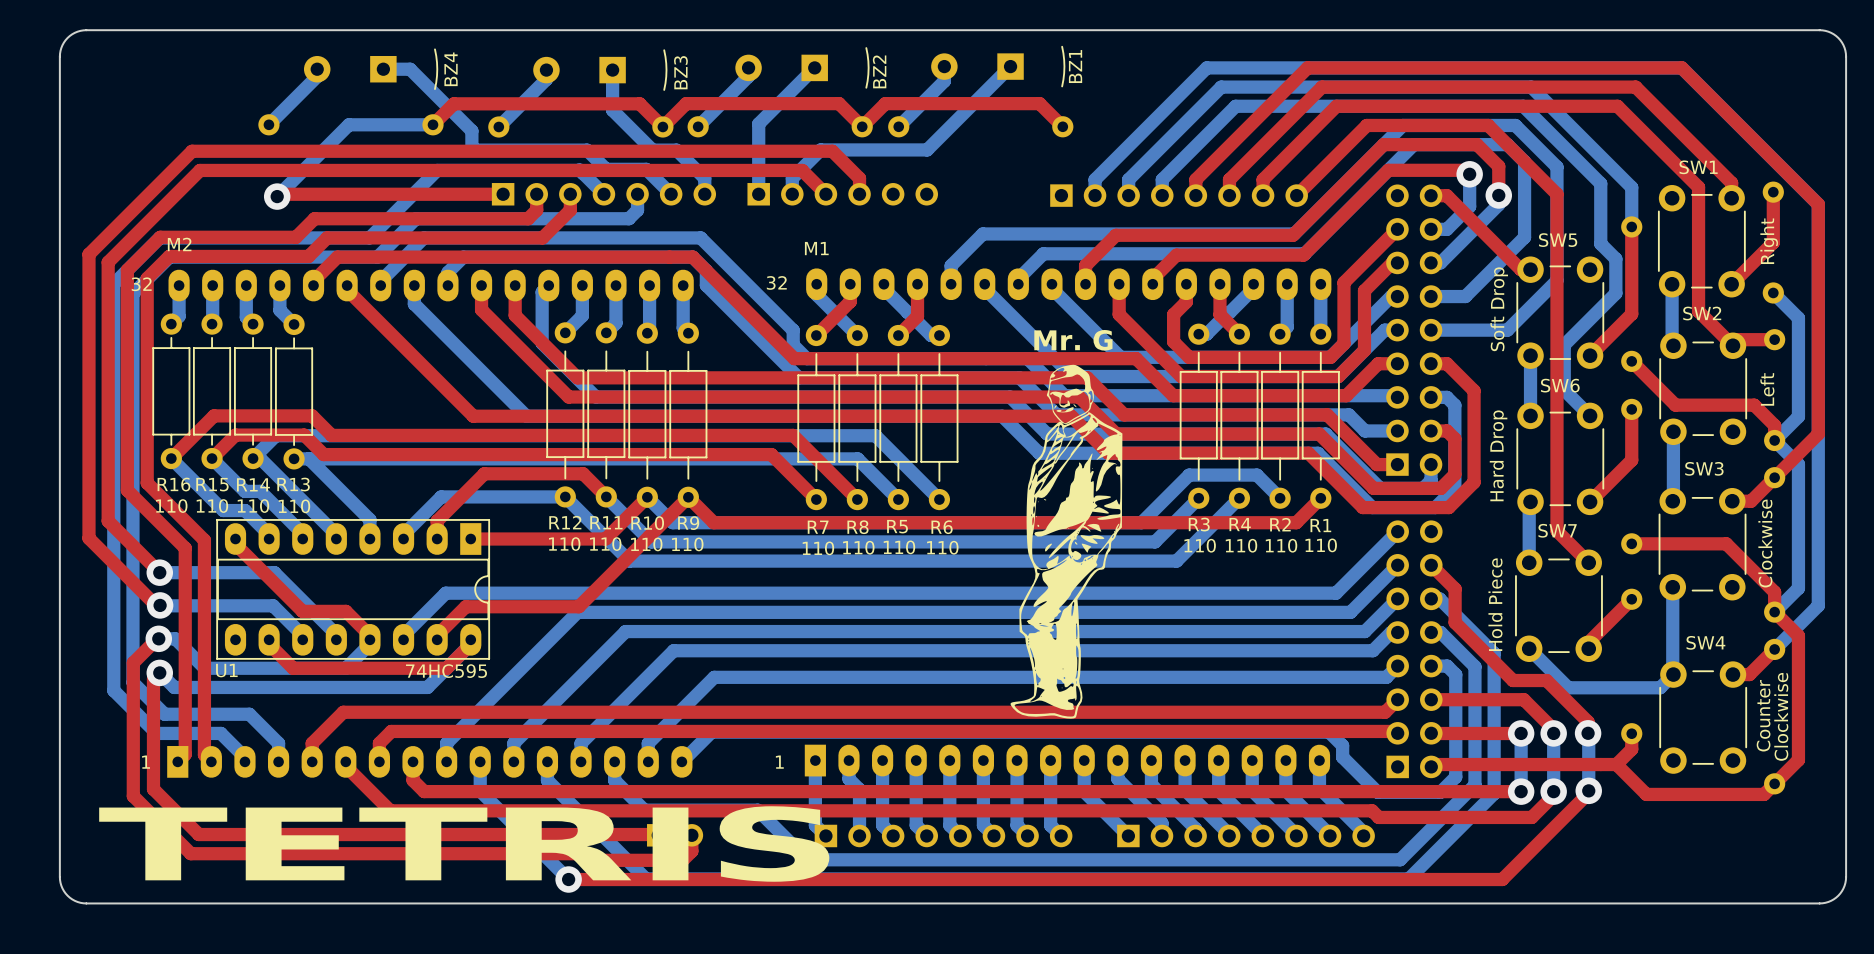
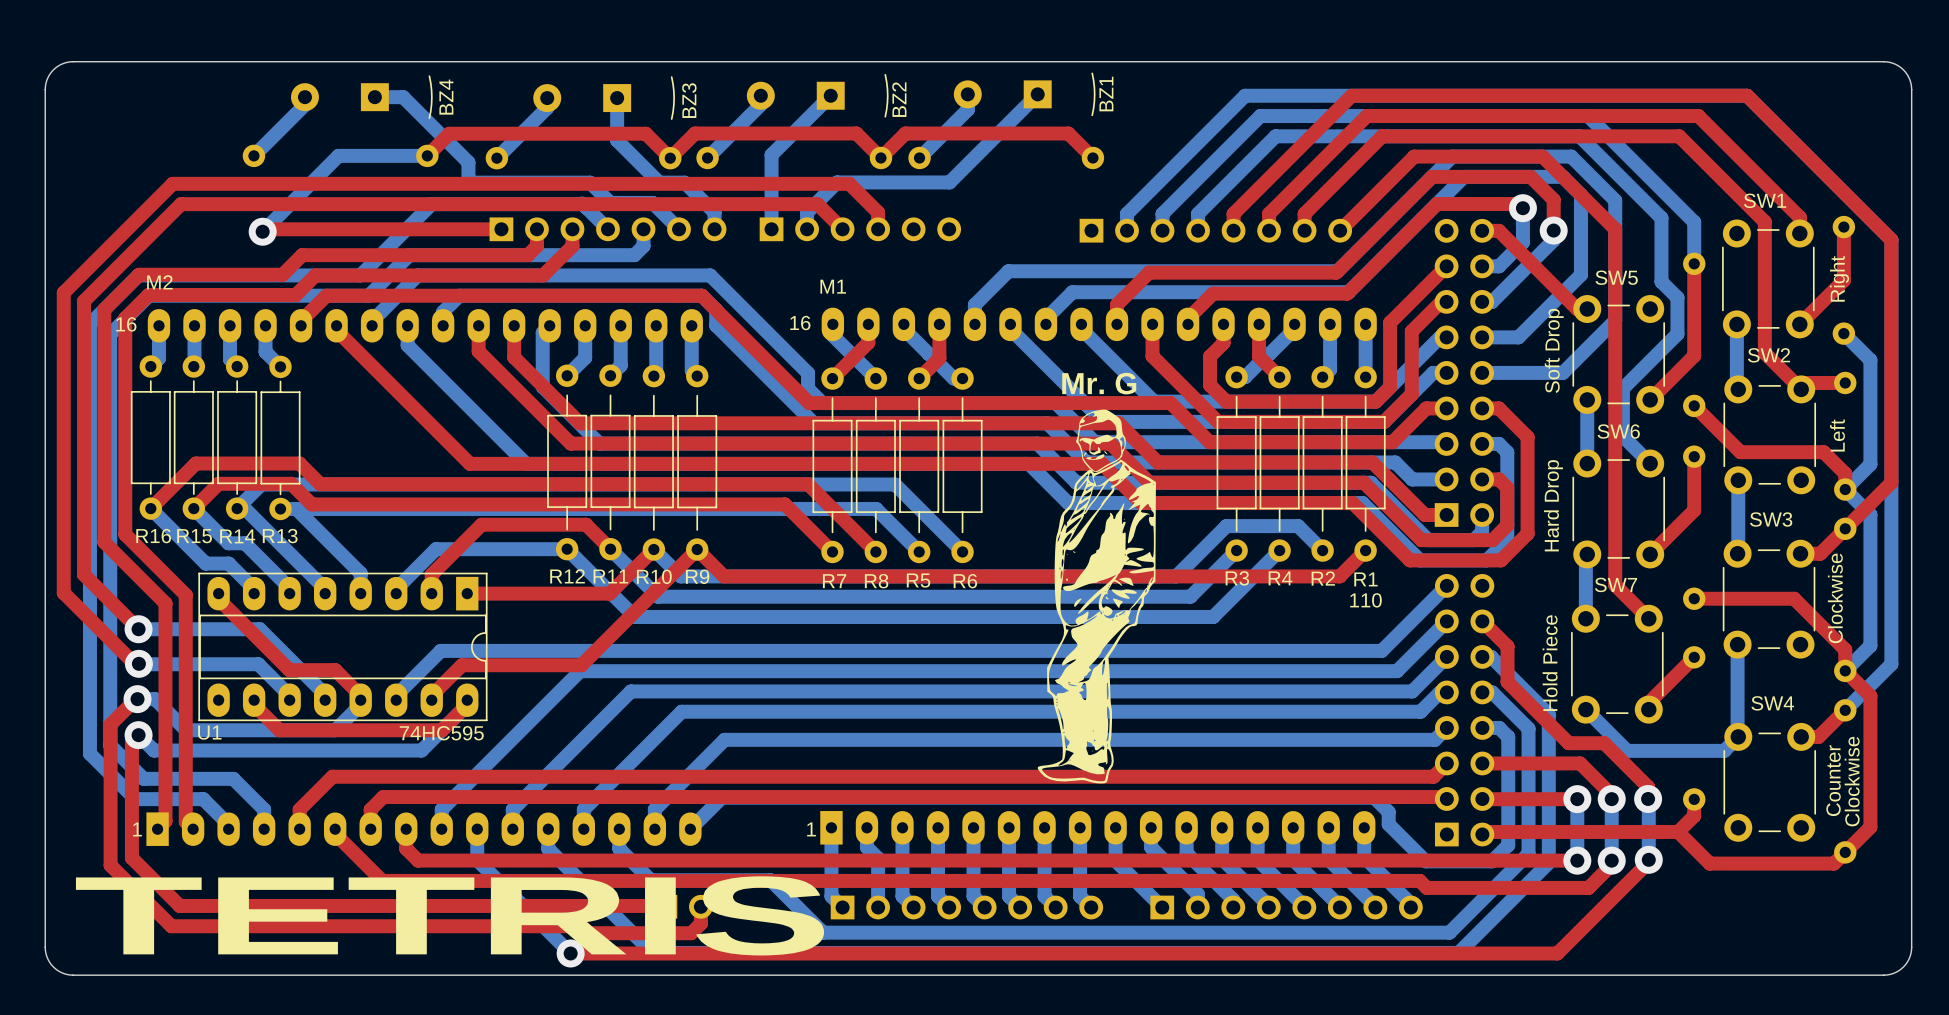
board edge: (86, 30) (1819, 30) (1831, 32) (1842, 42) (1846, 56) (1846, 876) (1843, 888) (1833, 899) (1819, 903) (86, 903) (74, 900) (63, 891) (59, 876) (59, 56) (62, 45) (67, 37) (77, 31) (86, 30) -> (73, 61) (63, 63) (53, 69) (48, 77) (45, 89) (45, 947) (49, 962) (61, 972) (73, 975) (1883, 975) (1898, 970) (1908, 959) (1911, 947) (1911, 89) (1907, 74) (1895, 64) (1883, 61) (73, 61)
M1 text: 32 (776, 282) -> none
M1 text: none -> 16 (800, 323)
M2 text: 32 (141, 284) -> none
M2 text: none -> 16 (126, 324)
R16 value: 110 (171, 506) -> none
R15 value: 110 (212, 506) -> none
R14 value: 110 (253, 506) -> none
R13 value: 110 (294, 506) -> none
R12 value: 110 (564, 544) -> none
R11 value: 110 (605, 544) -> none
R10 value: 110 (646, 544) -> none
R9 value: 110 (687, 544) -> none
R3 value: 110 (1200, 545) -> none
R4 value: 110 (1241, 545) -> none
R2 value: 110 (1281, 545) -> none
R8 value: 110 (858, 547) -> none
R5 value: 110 (899, 547) -> none
R6 value: 110 (942, 547) -> none
R7 value: 110 (818, 548) -> none
M2 text position: 1 (146, 762) -> 1 (137, 829)
M1 text position: 1 (779, 762) -> 1 (811, 829)

